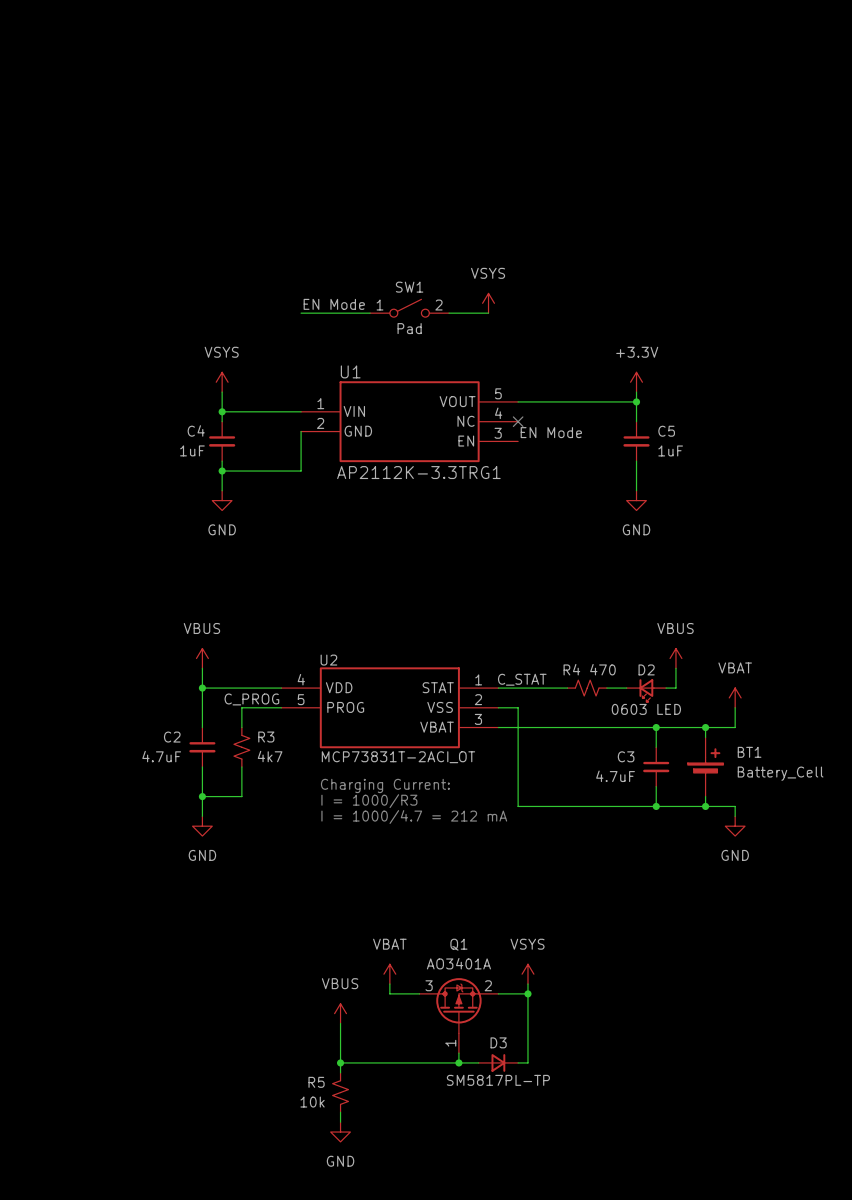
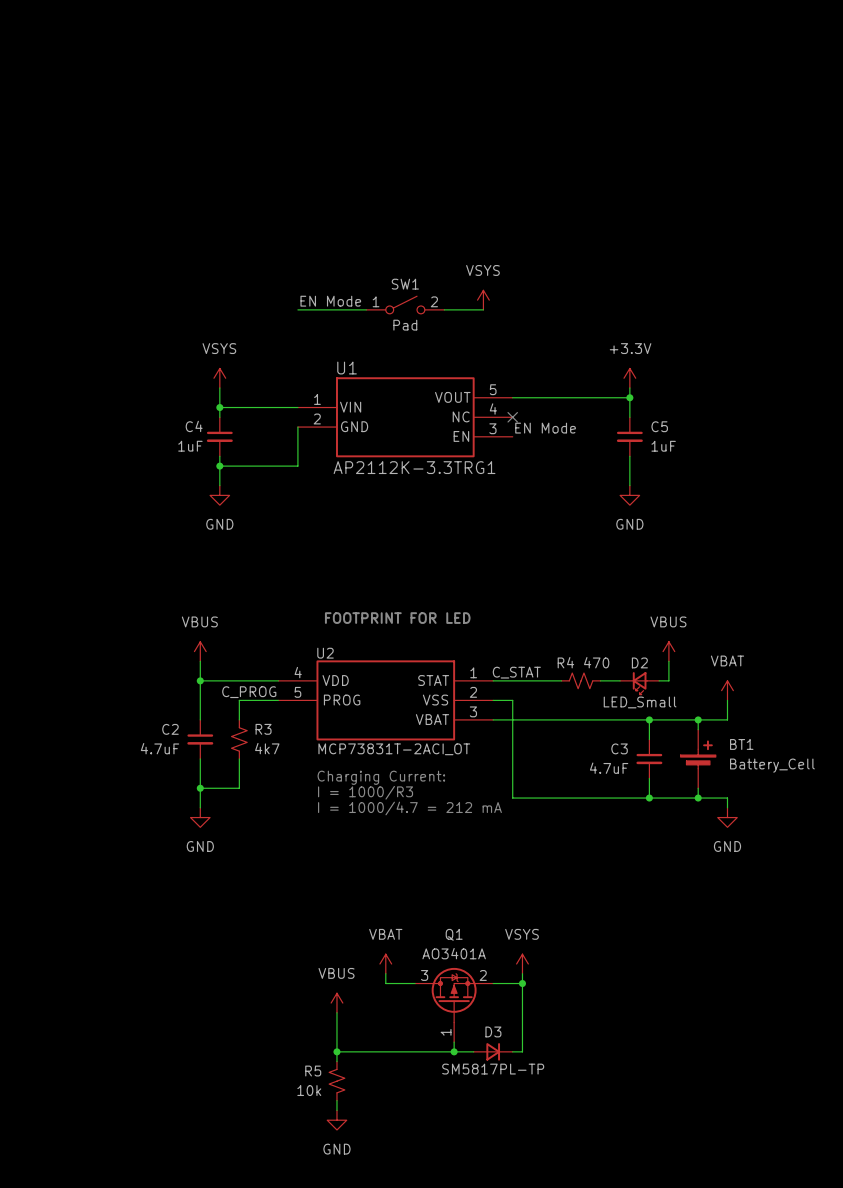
text: none -> FOOTPRINT FOR LED (397, 618)
D2 value: 0603 LED (646, 709) -> LED_Small (640, 702)

